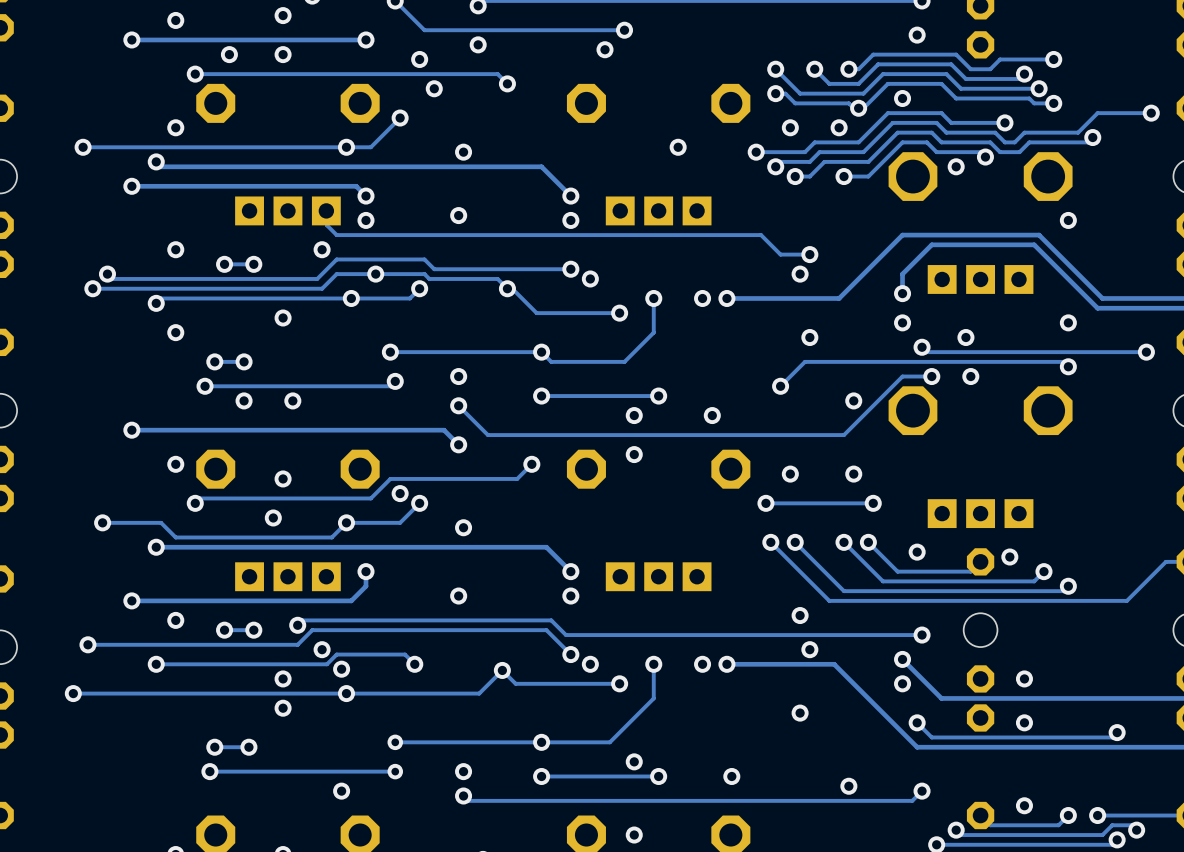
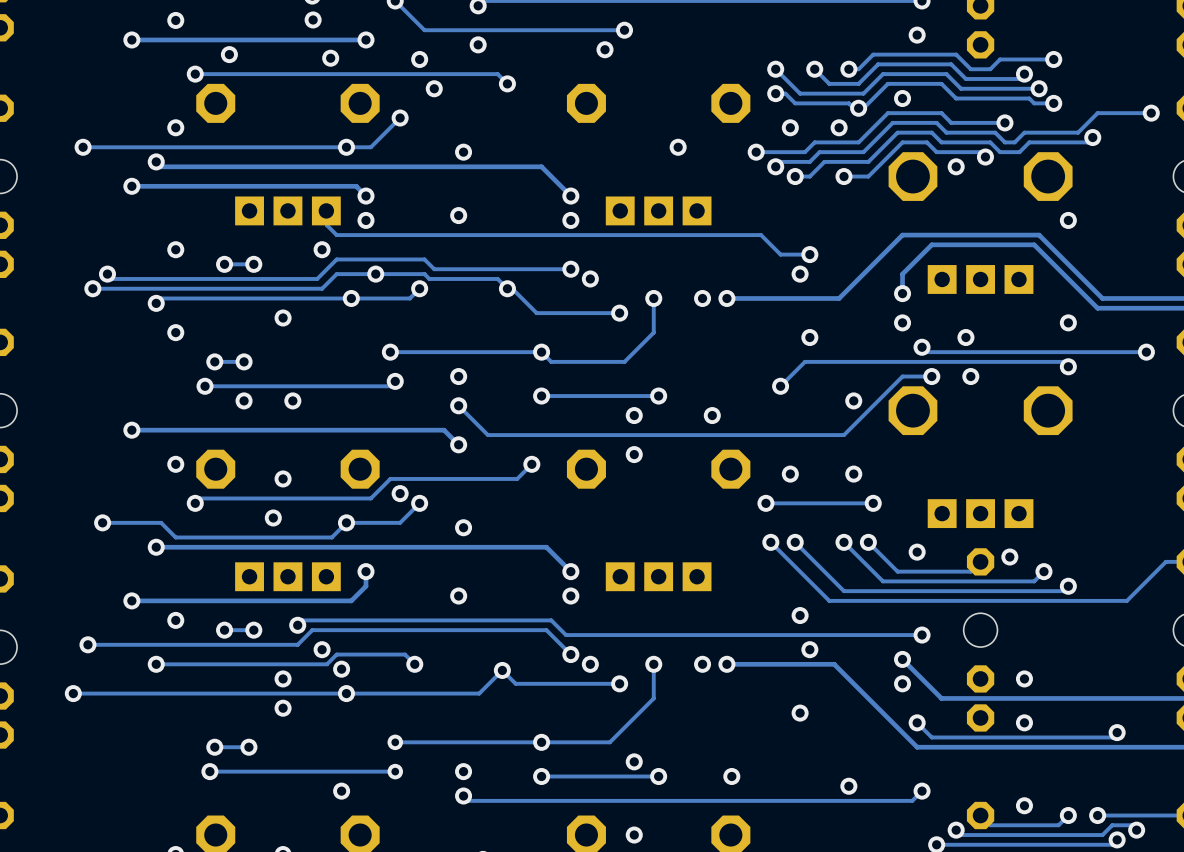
via: (283, 15) -> none
via: none -> (313, 19)
via: (283, 54) -> none
via: none -> (330, 58)

